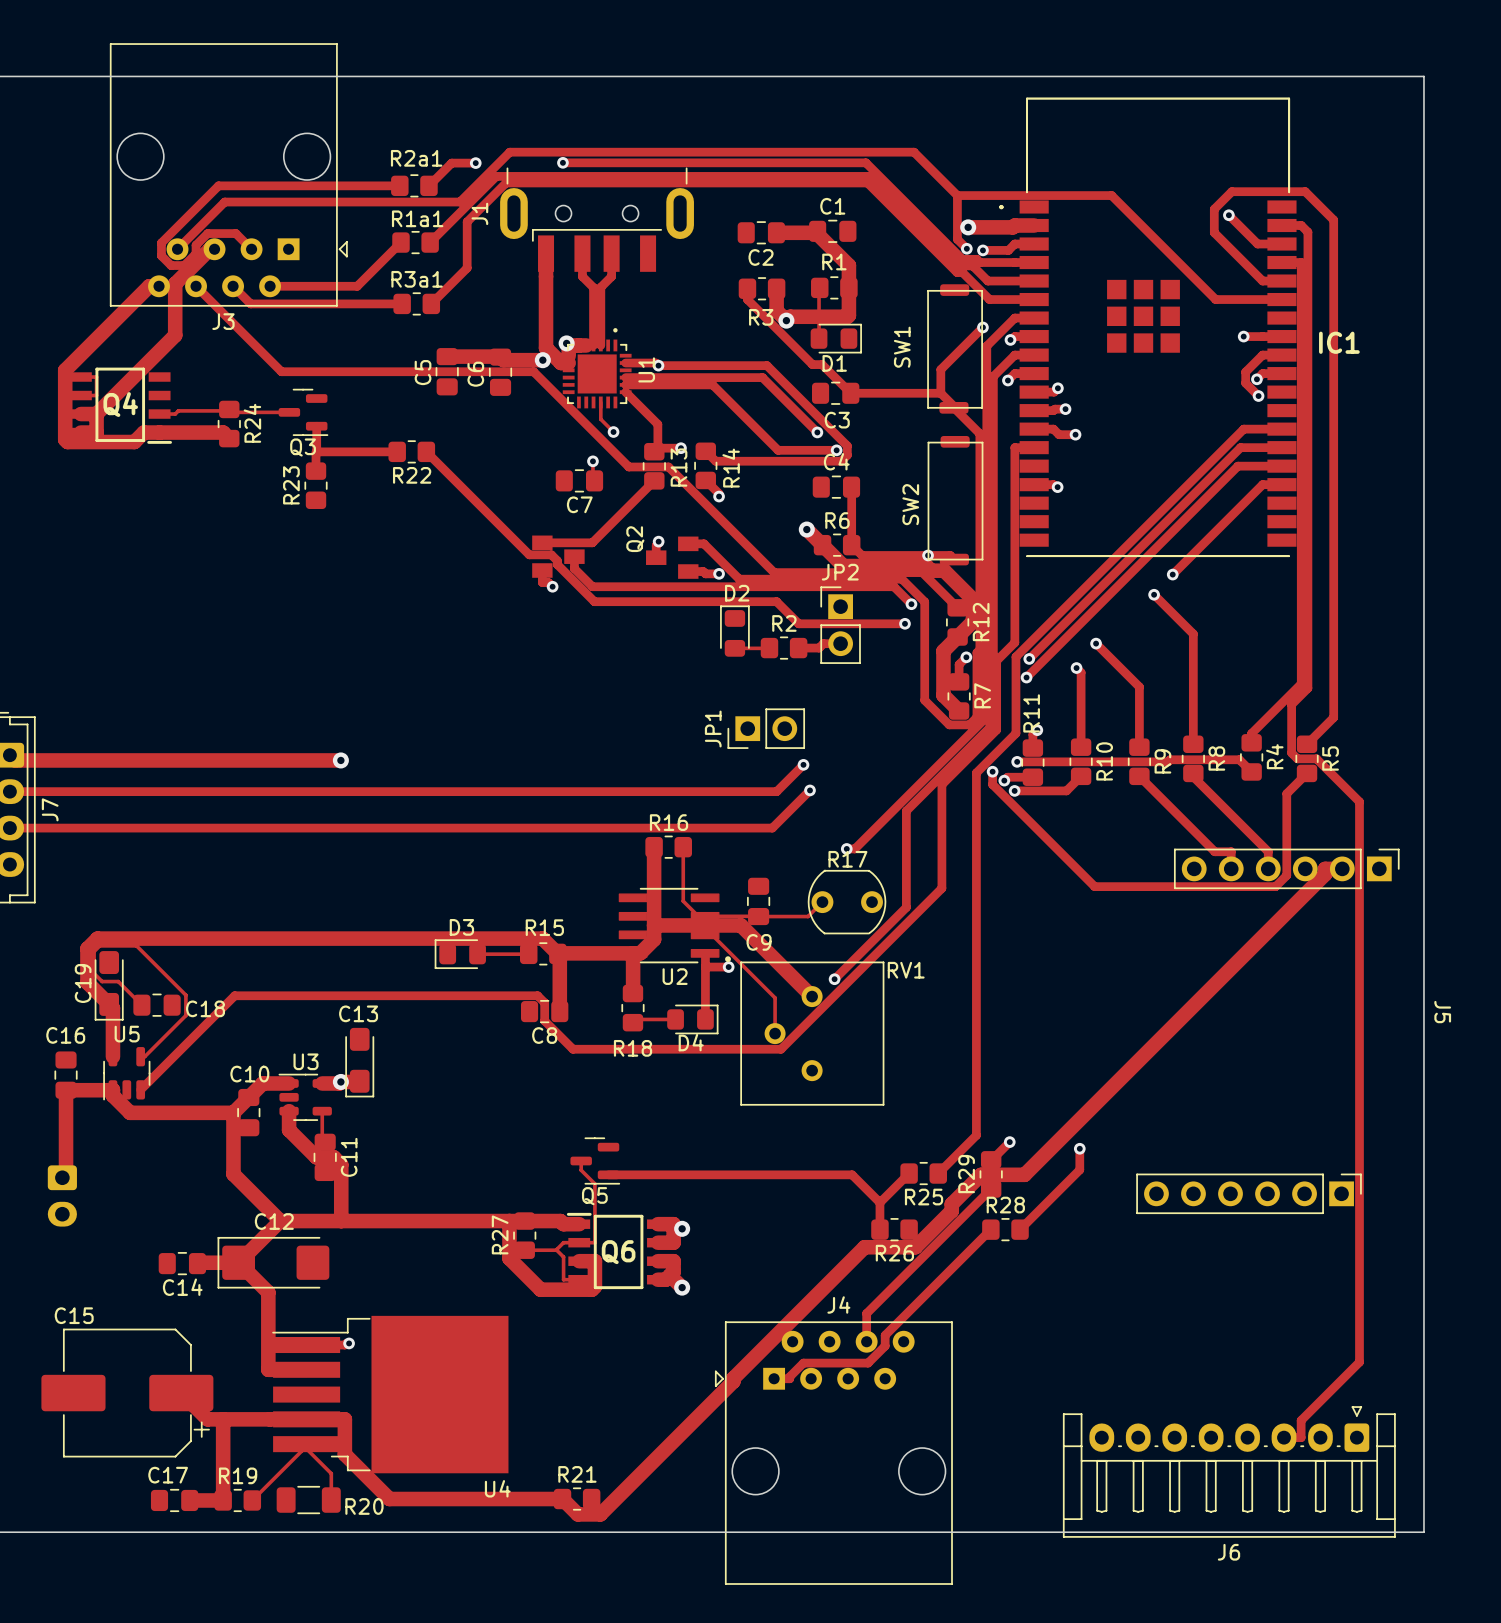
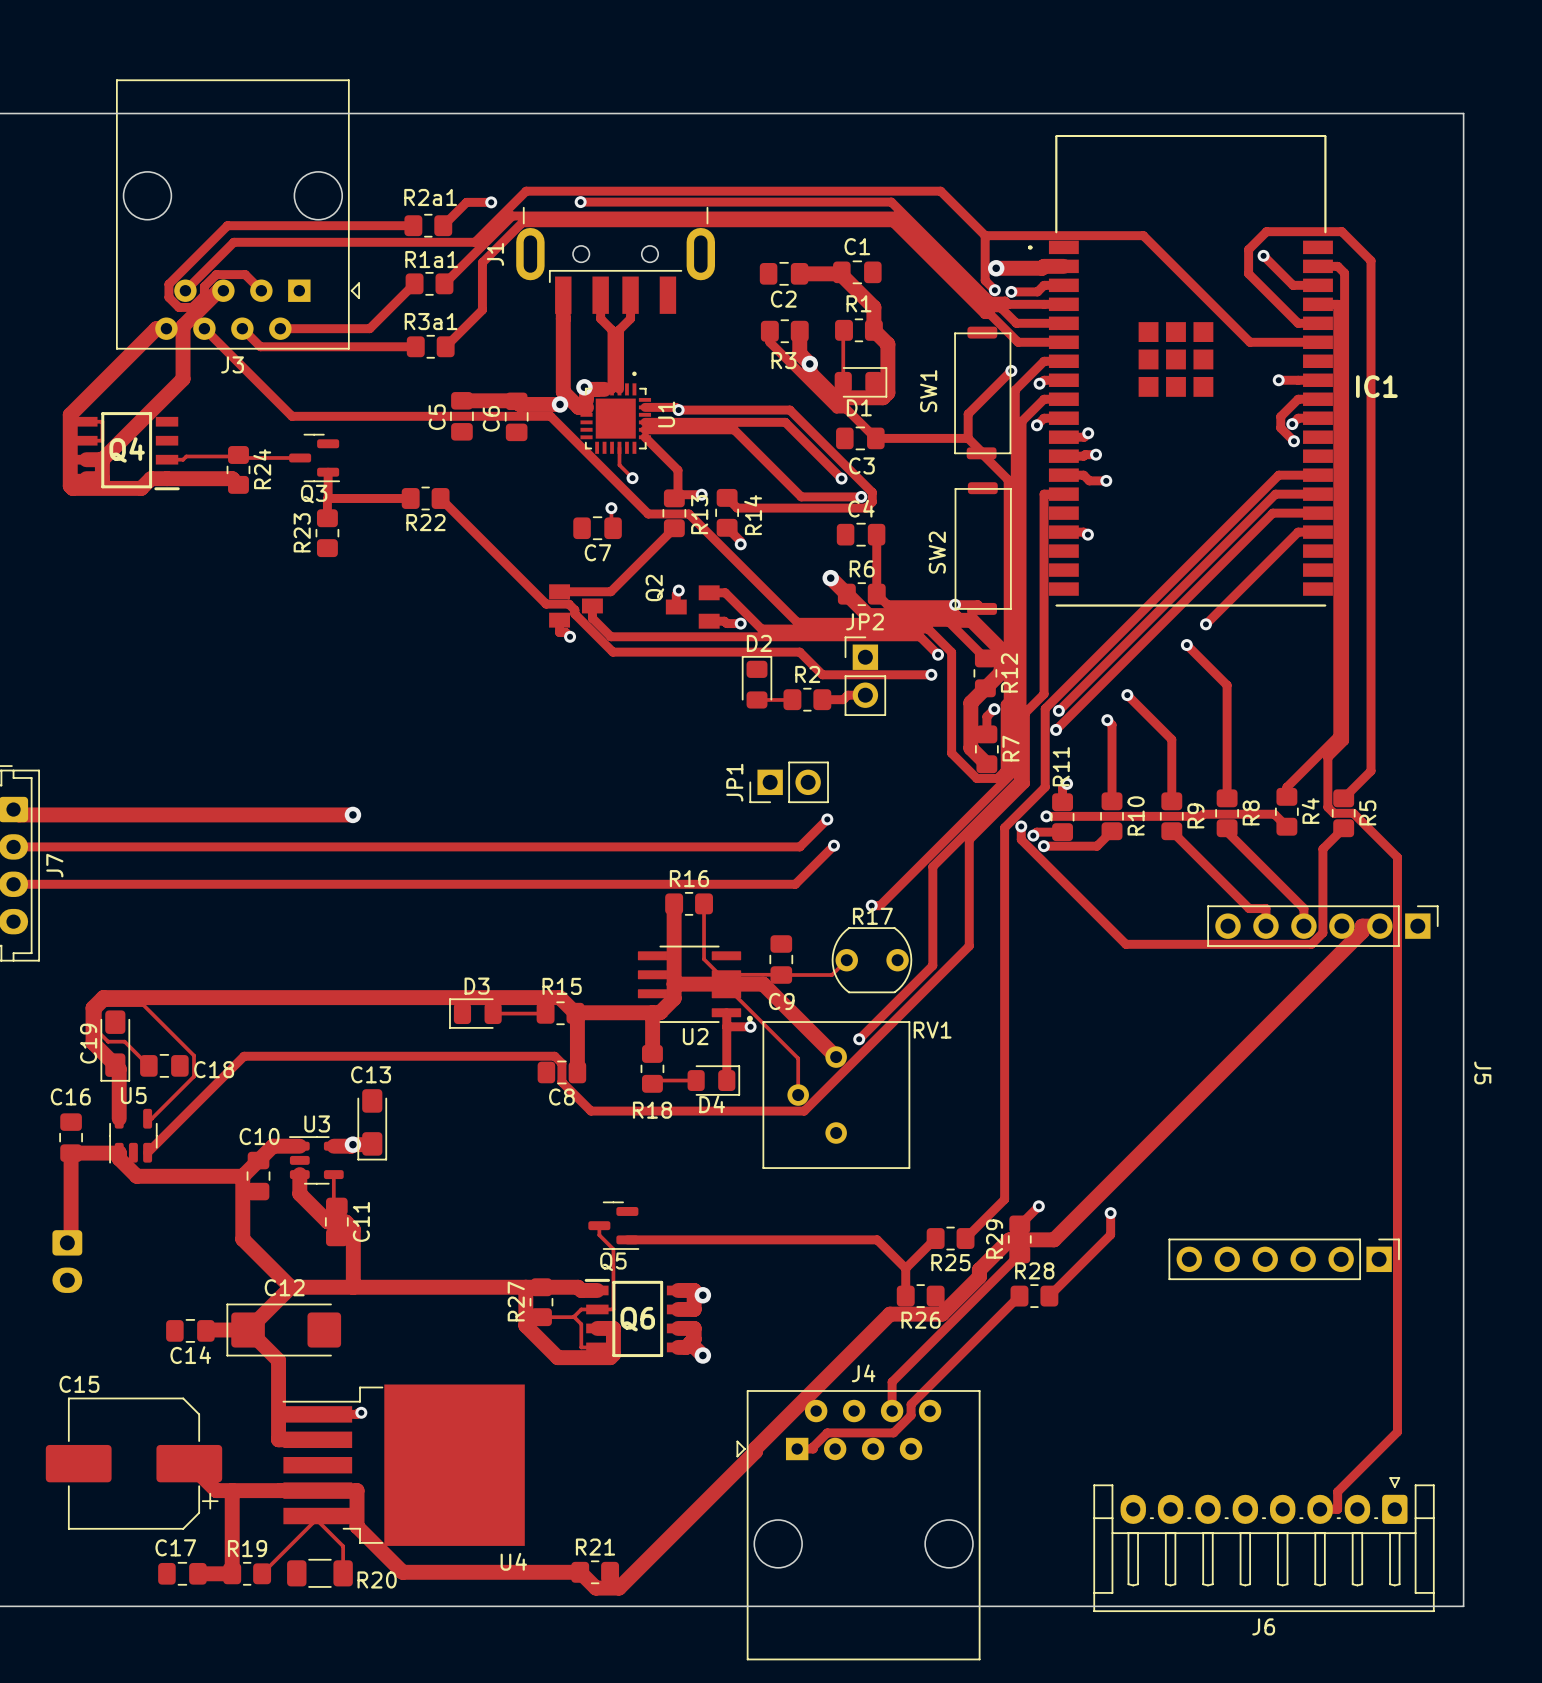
track: (848, 287) (847, 316) (790, 316) (786, 320) -> (873, 330) (887, 344) (887, 392) (882, 397) (834, 397) (809, 372) (809, 363)

